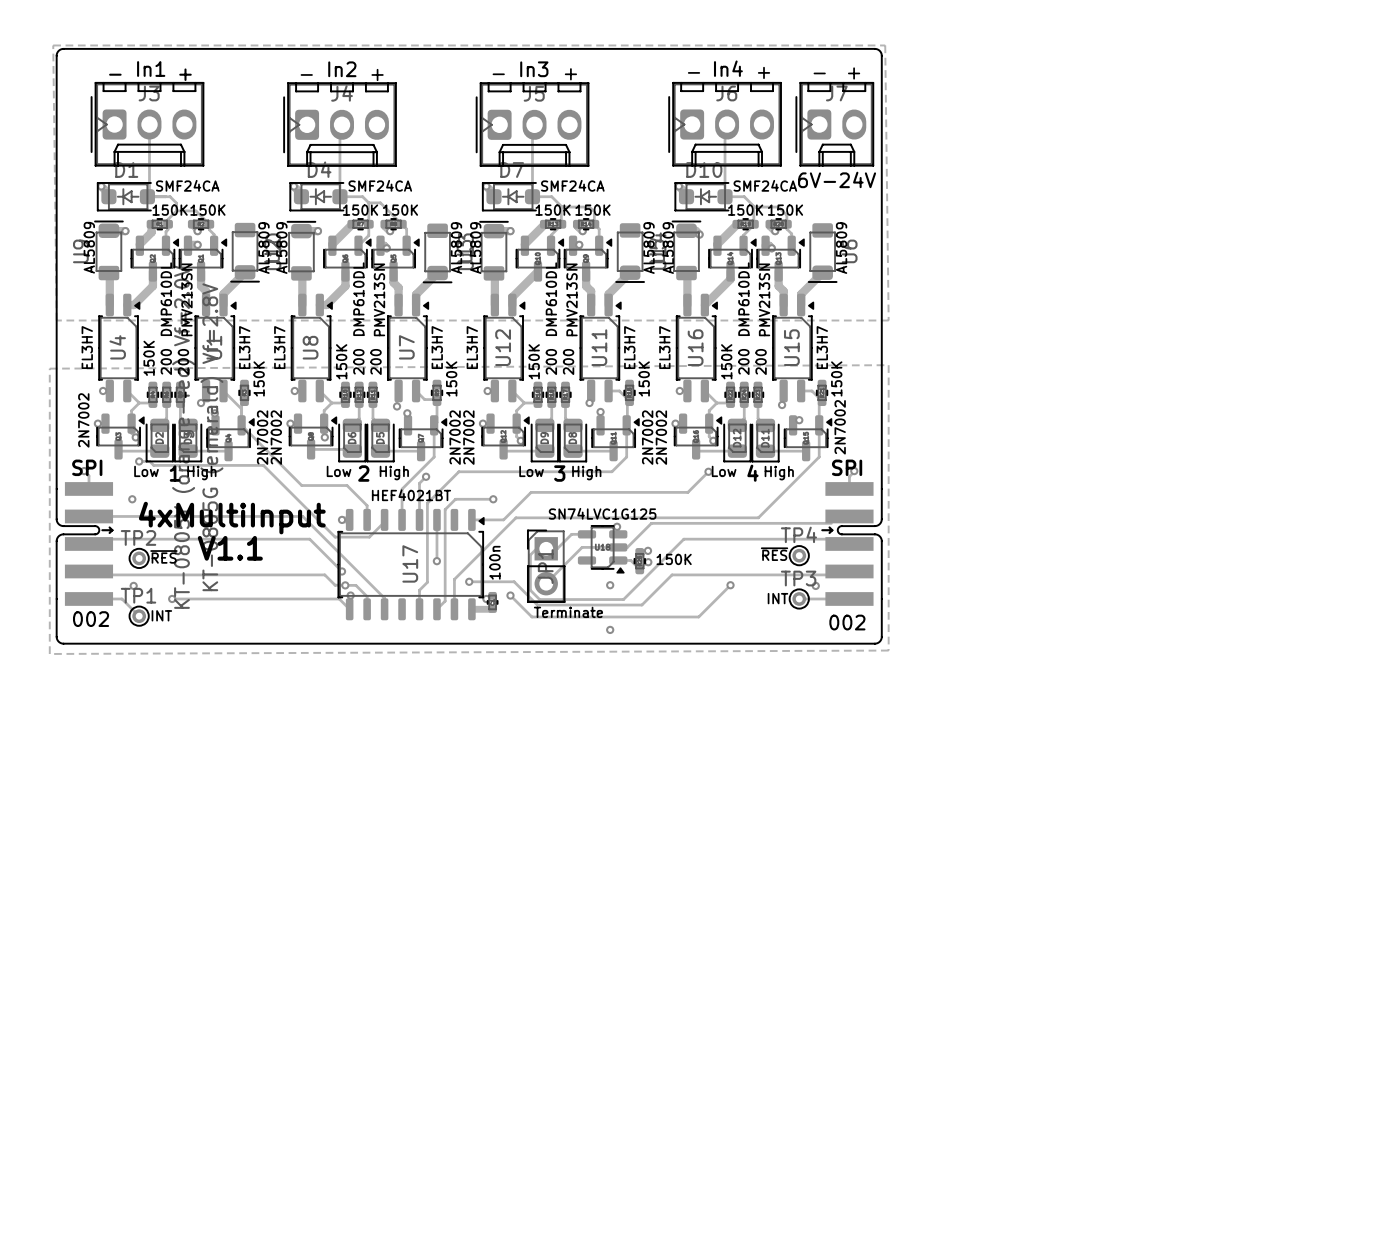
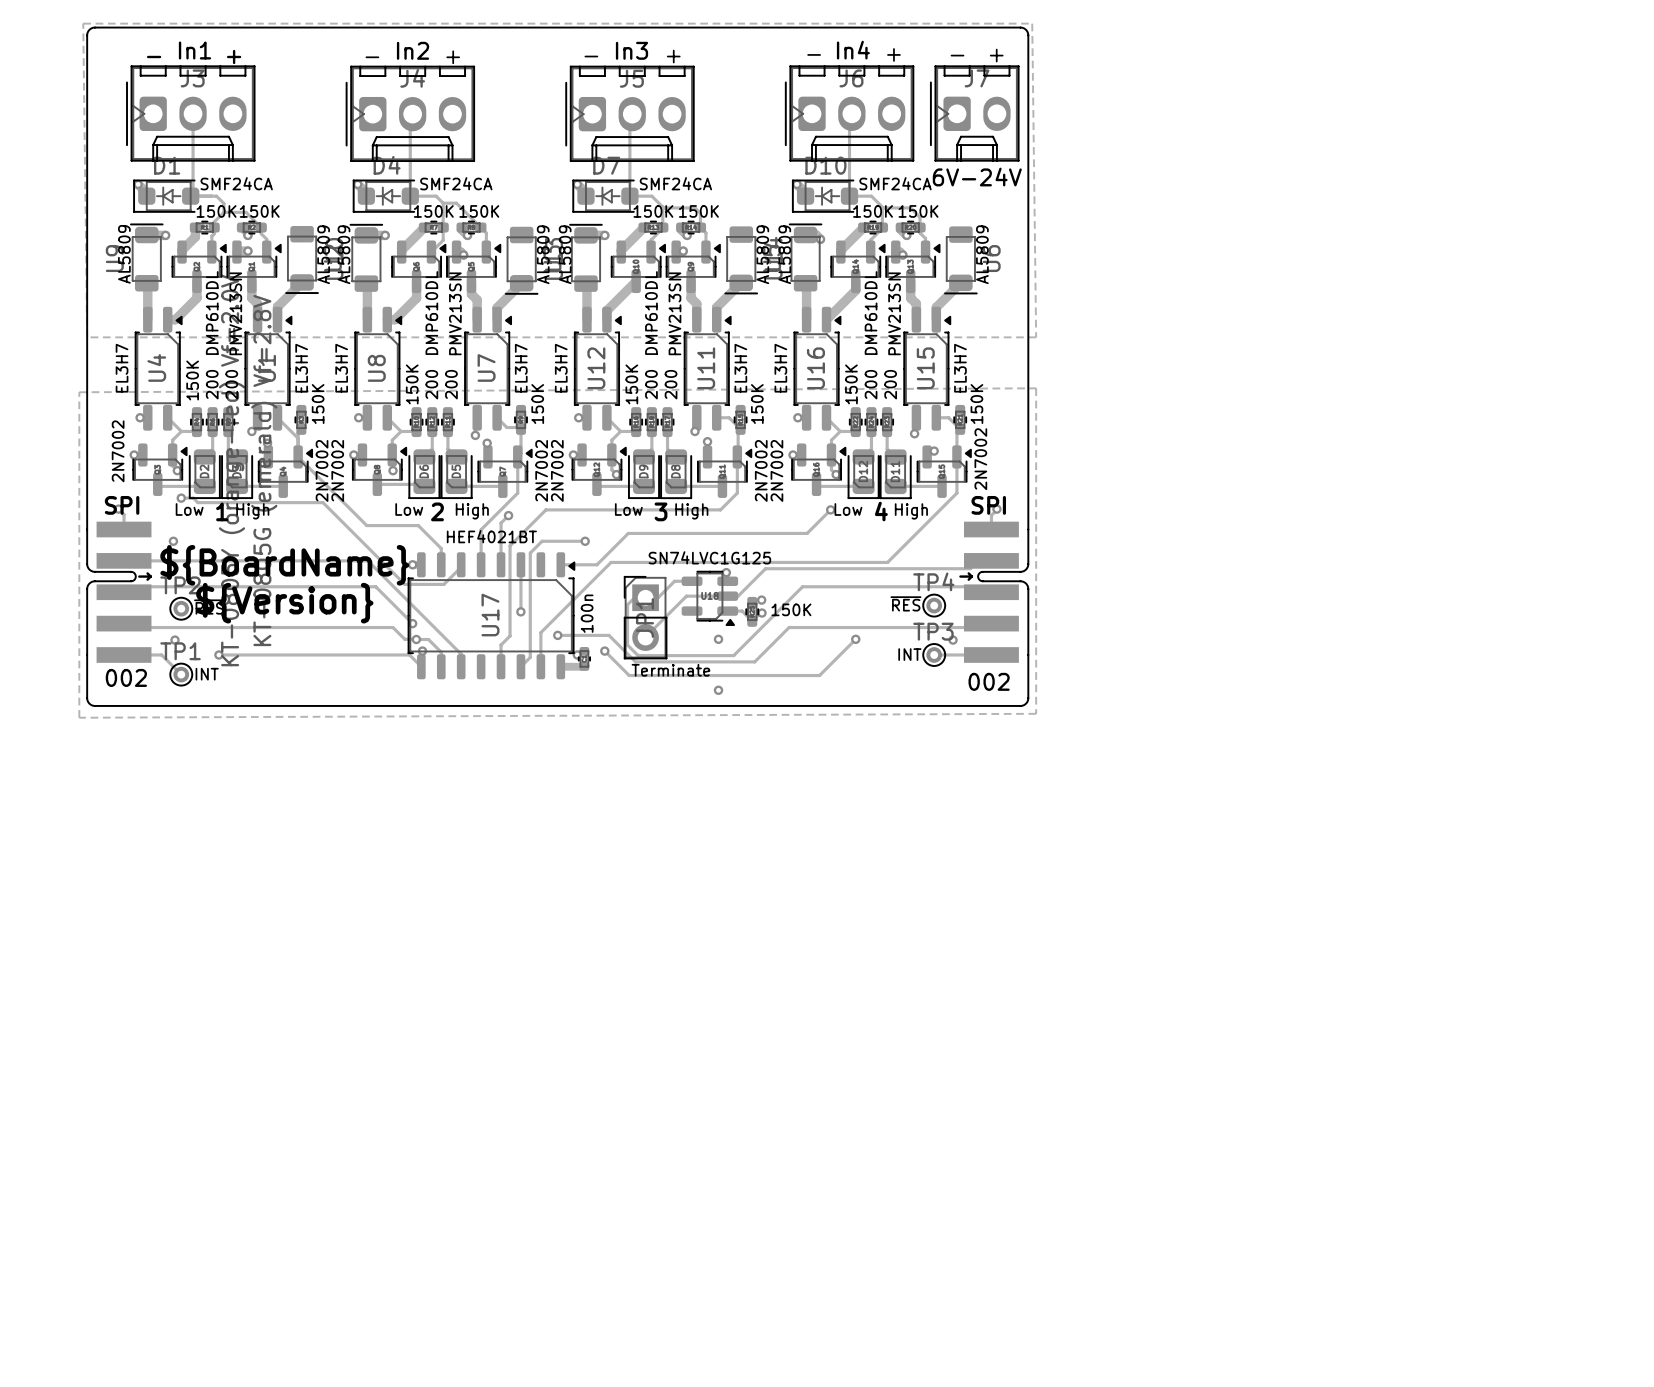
text: 4xMultiInput (232, 518) -> ${BoardName} (284, 565)
text: V1.1 (230, 548) -> ${Version} (284, 603)

